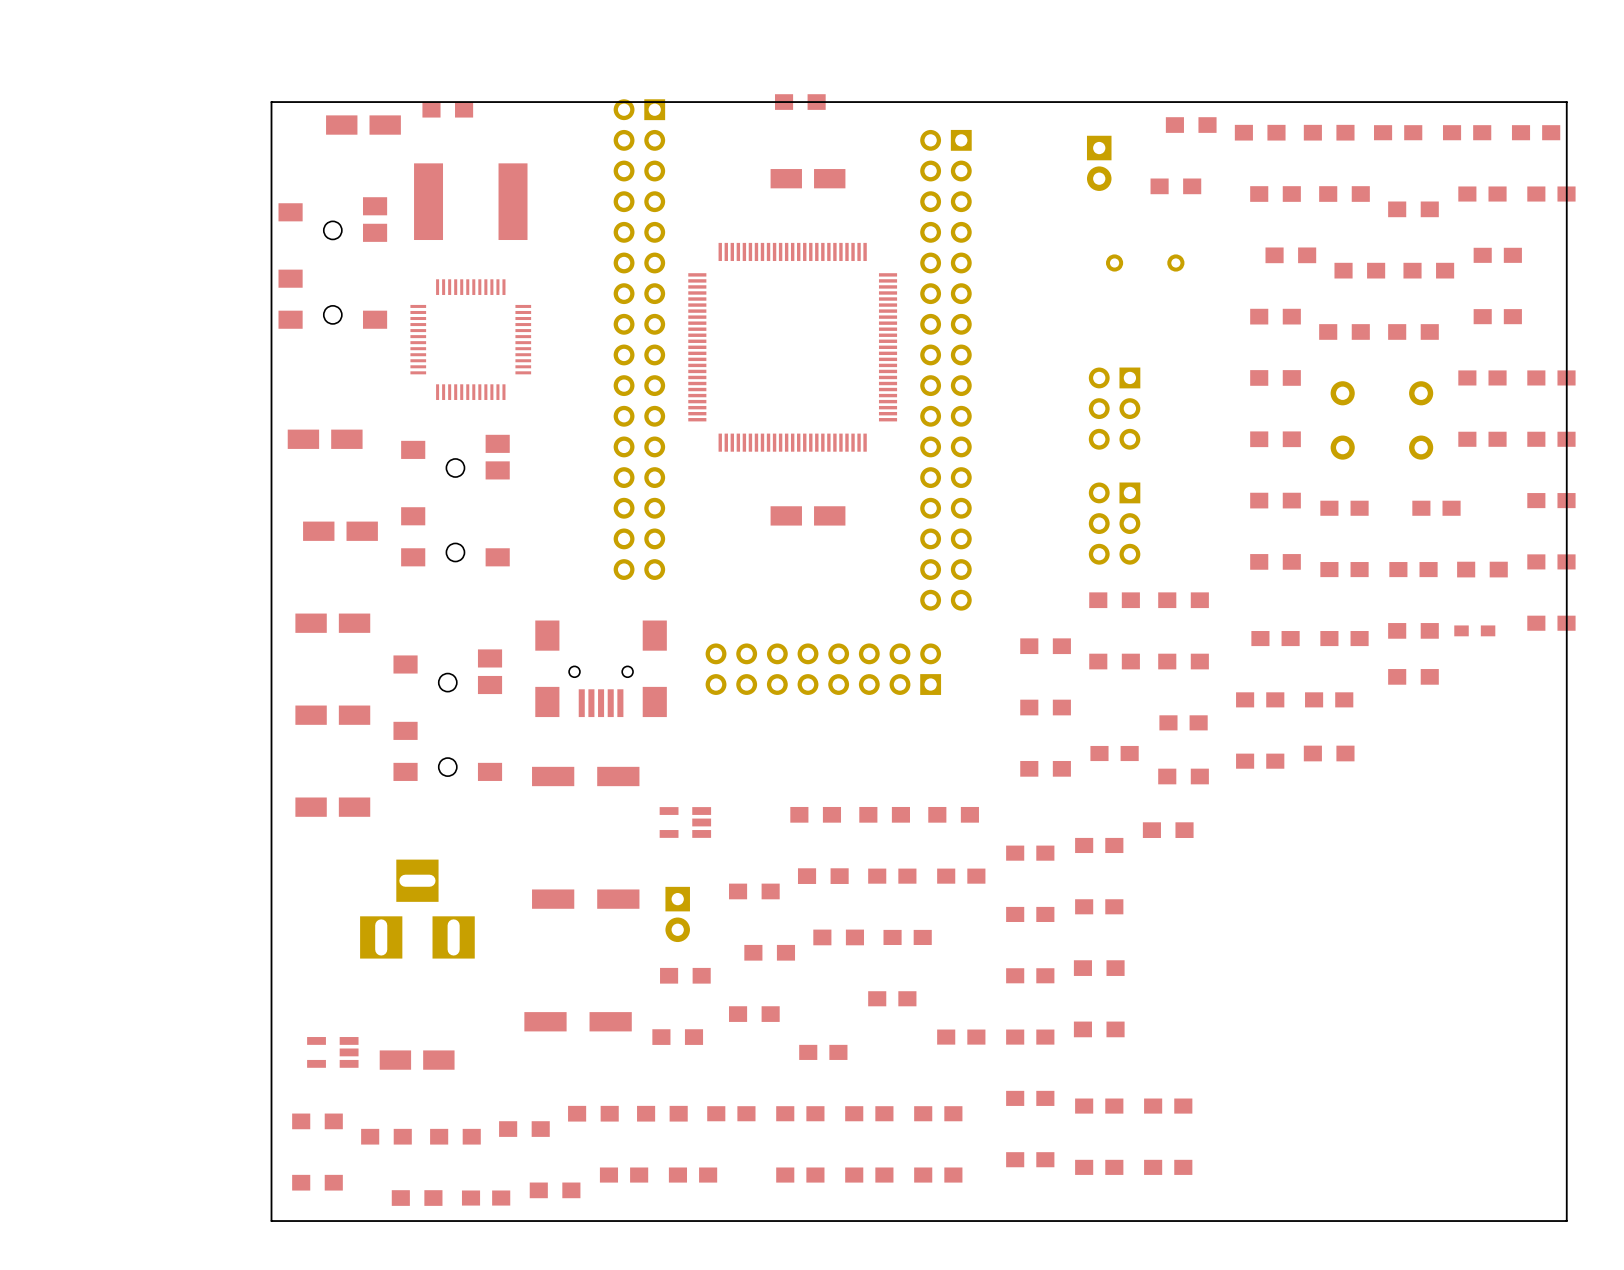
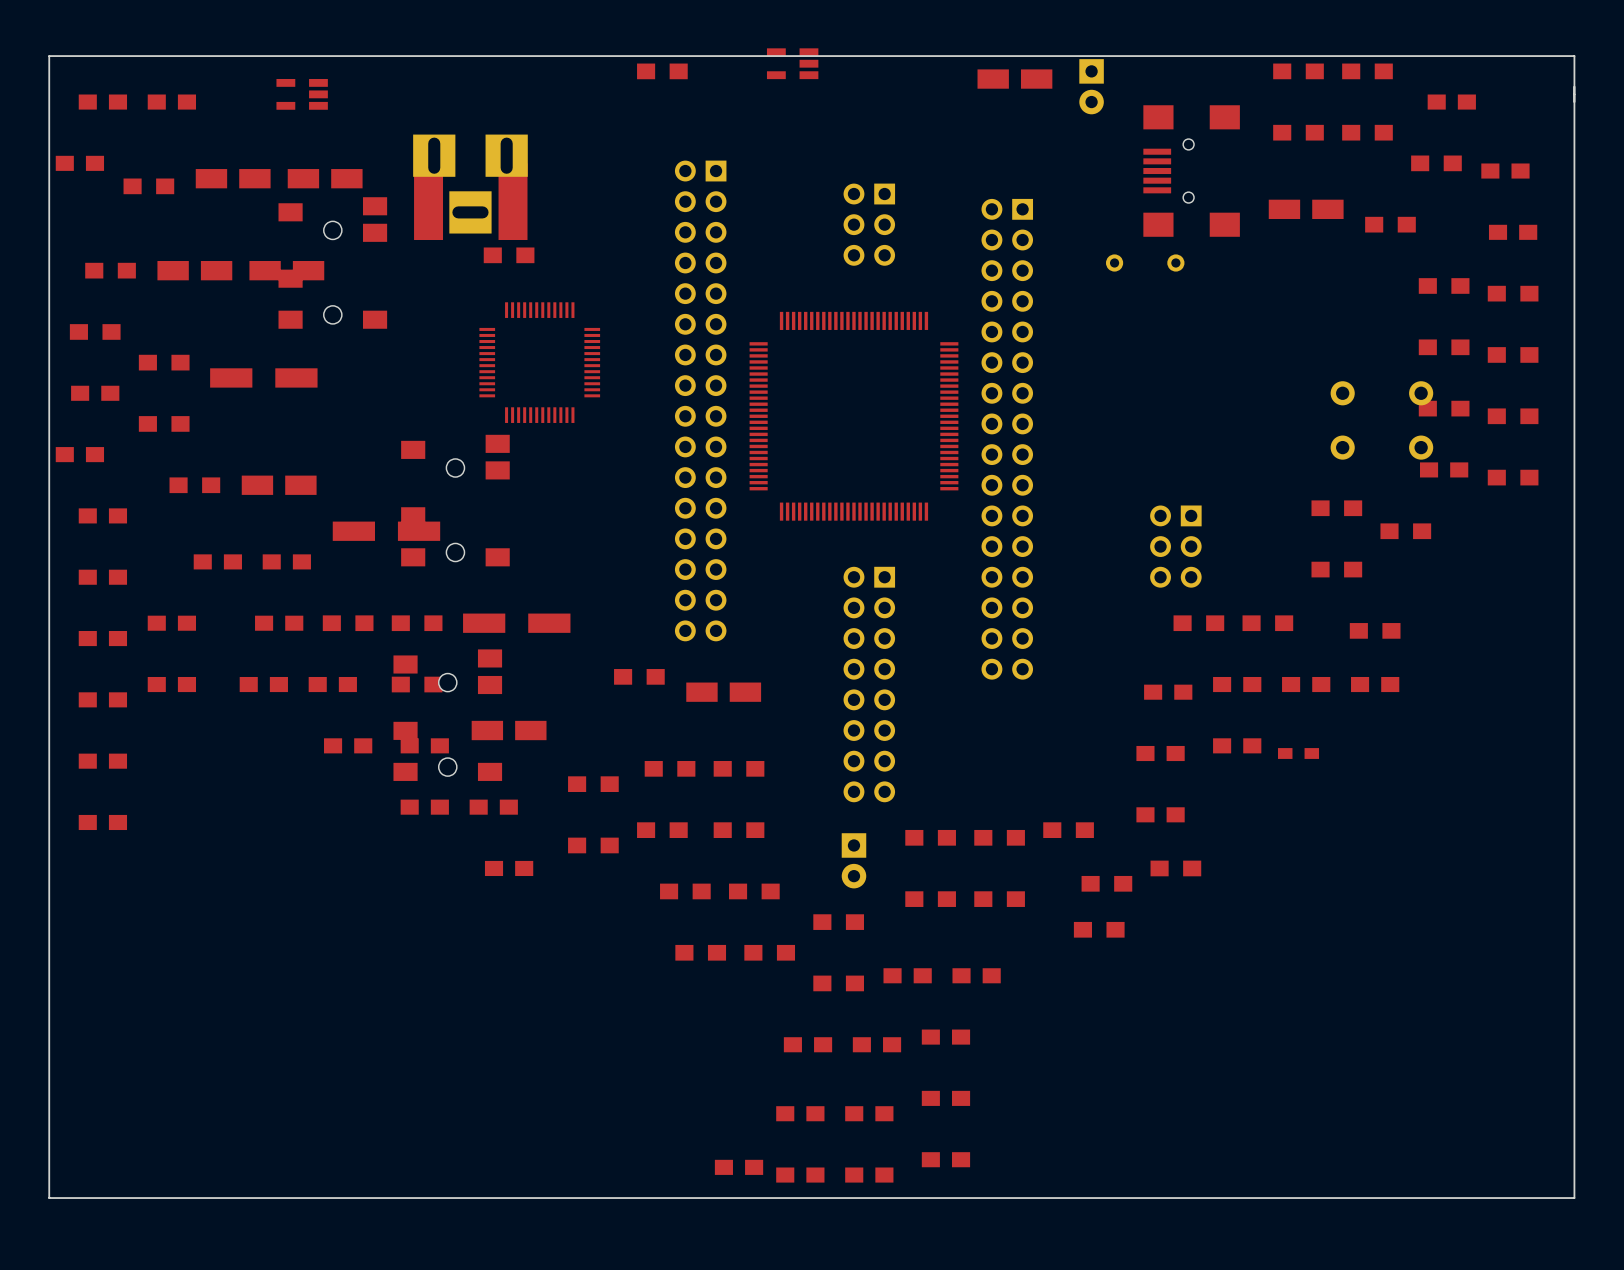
part: none -> (792, 63)
part: none -> (662, 71)
part: none -> (1298, 71)
part: none -> (1367, 71)
part: none -> (302, 94)
part: none -> (102, 102)
part: none -> (171, 102)
part: (800, 102) -> none
part: none -> (1451, 102)
board edge: (1566, 102) (271, 102) (271, 1221) (1566, 1221) (1566, 102) -> (1574, 56) (1574, 1198) (49, 1198) (49, 56) (1574, 56)
part: (447, 109) -> none
part position: (363, 125) -> (325, 178)
part: (1191, 125) -> none
part: (1260, 132) -> none
part: none -> (1298, 132)
part: (1329, 132) -> none
part: none -> (1367, 132)
part: (1398, 132) -> none
part: (1467, 132) -> none
part: (1536, 132) -> none
part: none -> (79, 163)
part position: (1099, 163) -> (1091, 86)
part: none -> (1436, 163)
part: none -> (1191, 171)
part: none -> (1505, 171)
part: none -> (233, 178)
part position: (808, 178) -> (1014, 79)
part: none -> (470, 184)
part: none -> (148, 186)
part: (1175, 186) -> none
part: (1275, 194) -> none
part: (1344, 194) -> none
part: (1482, 194) -> none
part: (1551, 194) -> none
part: none -> (1306, 209)
part: (1413, 209) -> none
part: none -> (869, 224)
part: none -> (1390, 224)
part: none -> (1513, 232)
part: none -> (509, 255)
part: (1290, 255) -> none
part: (1497, 255) -> none
part: none -> (110, 270)
part: none -> (194, 270)
part: none -> (286, 270)
part: (1359, 270) -> none
part position: (1428, 270) -> (1444, 285)
part: none -> (1513, 293)
part: (1275, 316) -> none
part: (1497, 316) -> none
part: none -> (95, 331)
part: (1344, 331) -> none
part: (1413, 331) -> none
part position: (470, 339) -> (539, 362)
part position: (639, 339) -> (700, 400)
part position: (792, 347) -> (853, 416)
part: none -> (1444, 347)
part: none -> (1513, 354)
part: none -> (164, 362)
part position: (945, 370) -> (1007, 439)
part: none -> (263, 377)
part: (1275, 377) -> none
part: (1482, 377) -> none
part: (1551, 377) -> none
part: none -> (95, 393)
part: (1114, 408) -> none
part: none -> (1444, 408)
part: none -> (1513, 416)
part: none -> (164, 423)
part: (325, 439) -> none
part: (1275, 439) -> none
part: (1482, 439) -> none
part: (1551, 439) -> none
part: none -> (79, 454)
part: none -> (1444, 469)
part: none -> (1513, 477)
part: none -> (194, 485)
part: none -> (279, 485)
part: (1275, 500) -> none
part footprint: [1320, 500, 1369, 516] -> [1311, 500, 1363, 517]
part: (1551, 500) -> none
part: (1436, 508) -> none
part: none -> (102, 515)
part: (808, 515) -> none
part position: (1114, 523) -> (1175, 546)
part: (340, 531) -> none
part: none -> (386, 531)
part: none -> (1405, 531)
part: none -> (217, 561)
part: none -> (286, 561)
part: (1275, 561) -> none
part: (1551, 561) -> none
part footprint: [1320, 562, 1369, 578] -> [1311, 561, 1363, 578]
part: (1413, 569) -> none
part: (1482, 569) -> none
part: none -> (102, 577)
part: (1114, 600) -> none
part: (1183, 600) -> none
part: none -> (171, 623)
part: none -> (279, 623)
part: (332, 623) -> none
part: none -> (348, 623)
part: none -> (417, 623)
part: none -> (516, 623)
part: none -> (1198, 623)
part: none -> (1267, 623)
part: (1551, 623) -> none
part: none -> (1375, 630)
part: (1413, 630) -> none
part position: (1474, 630) -> (1298, 753)
part: none -> (102, 638)
part: (1275, 638) -> none
part: (1344, 638) -> none
part: (1045, 646) -> none
part: (1114, 661) -> none
part: (1183, 661) -> none
part: (601, 668) -> none
part rotation: 0° (823, 669) -> 90° counterclockwise (869, 684)
part: none -> (639, 676)
part: (1413, 676) -> none
part: none -> (171, 684)
part: none -> (263, 684)
part: none -> (332, 684)
part: none -> (417, 684)
part: none -> (1237, 684)
part: none -> (1306, 684)
part: none -> (1375, 684)
part: none -> (723, 692)
part: none -> (1168, 692)
part: none -> (102, 699)
part: (1260, 699) -> none
part: (1329, 699) -> none
part: (1045, 707) -> none
part: (332, 715) -> none
part: (1183, 722) -> none
part: none -> (509, 730)
part: none -> (348, 745)
part: none -> (424, 745)
part: none -> (1237, 745)
part: (1114, 753) -> none
part: none -> (1160, 753)
part: (1329, 753) -> none
part: none -> (102, 761)
part: (1260, 761) -> none
part footprint: [532, 766, 640, 787] -> [568, 776, 619, 793]
part: none -> (670, 768)
part: none -> (739, 768)
part: (1045, 768) -> none
part: (1183, 776) -> none
part: (332, 807) -> none
part: none -> (424, 807)
part: none -> (493, 807)
part: (815, 814) -> none
part: (884, 814) -> none
part: (953, 814) -> none
part: none -> (1160, 814)
part: none -> (102, 822)
part: (685, 822) -> none
part: none -> (662, 830)
part: none -> (739, 830)
part: none -> (1068, 830)
part position: (1168, 830) -> (1175, 868)
part: none -> (930, 837)
part: none -> (999, 837)
part: none -> (593, 845)
part: (1099, 845) -> none
part: (1030, 853) -> none
part: none -> (509, 868)
part: (823, 876) -> none
part: (892, 876) -> none
part: (961, 876) -> none
part: none -> (1106, 883)
part: none -> (685, 891)
part: (585, 899) -> none
part: none -> (930, 899)
part: none -> (999, 899)
part: (1099, 906) -> none
part: (417, 909) -> none
part position: (677, 914) -> (853, 860)
part: (1030, 914) -> none
part position: (838, 937) -> (838, 922)
part: (907, 937) -> none
part position: (1099, 968) -> (1099, 929)
part position: (685, 975) -> (700, 952)
part: none -> (907, 975)
part: none -> (976, 975)
part: (1030, 975) -> none
part: none -> (838, 983)
part: (892, 998) -> none
part: (754, 1014) -> none
part: (578, 1021) -> none
part: (1099, 1029) -> none
part: (677, 1037) -> none
part position: (961, 1037) -> (945, 1037)
part: (1030, 1037) -> none
part: none -> (876, 1044)
part: (332, 1052) -> none
part position: (823, 1052) -> (808, 1044)
part: (417, 1060) -> none
part: (1030, 1098) -> none
part: (1099, 1106) -> none
part: (1168, 1106) -> none
part: (593, 1113) -> none
part: (662, 1113) -> none
part: (731, 1113) -> none
part position: (938, 1113) -> (945, 1098)
part: (317, 1121) -> none
part: (524, 1129) -> none
part: (386, 1136) -> none
part: (455, 1136) -> none
part: (1030, 1159) -> none
part: none -> (739, 1167)
part: (1099, 1167) -> none
part: (1168, 1167) -> none
part: (624, 1175) -> none
part: (693, 1175) -> none
part position: (938, 1175) -> (945, 1159)
part: (317, 1182) -> none
part: (555, 1190) -> none
part: (417, 1198) -> none
part: (486, 1198) -> none

